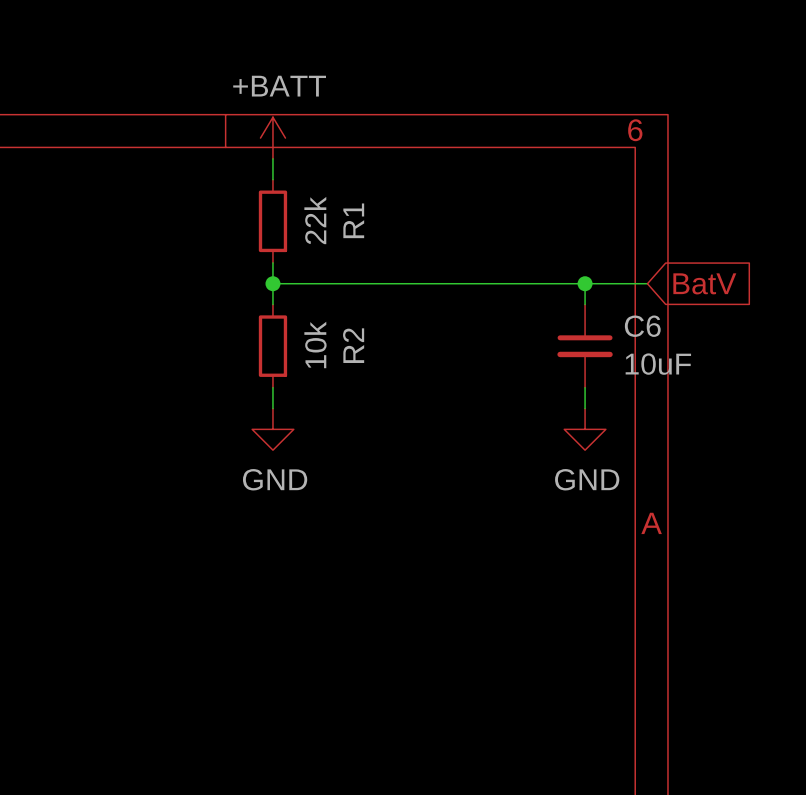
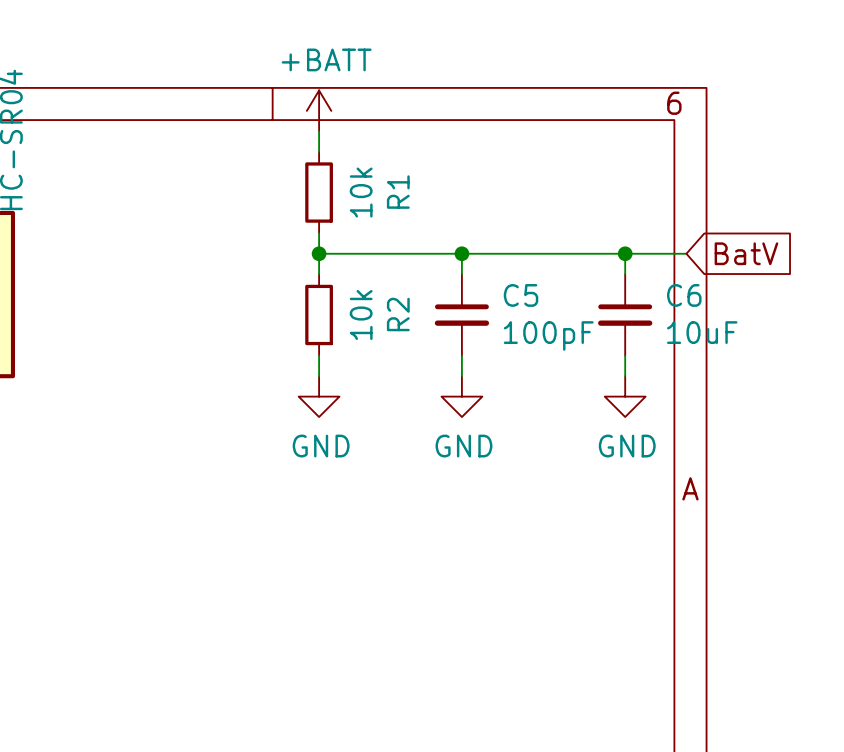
R1 value: 22k (315, 220) -> 10k (361, 192)
wire: none -> (461, 253) (461, 274)
junction: none -> (461, 253)
C5: none -> 100pF (461, 314)
wire: none -> (461, 355) (461, 376)
power symbol: none -> GND (461, 396)

